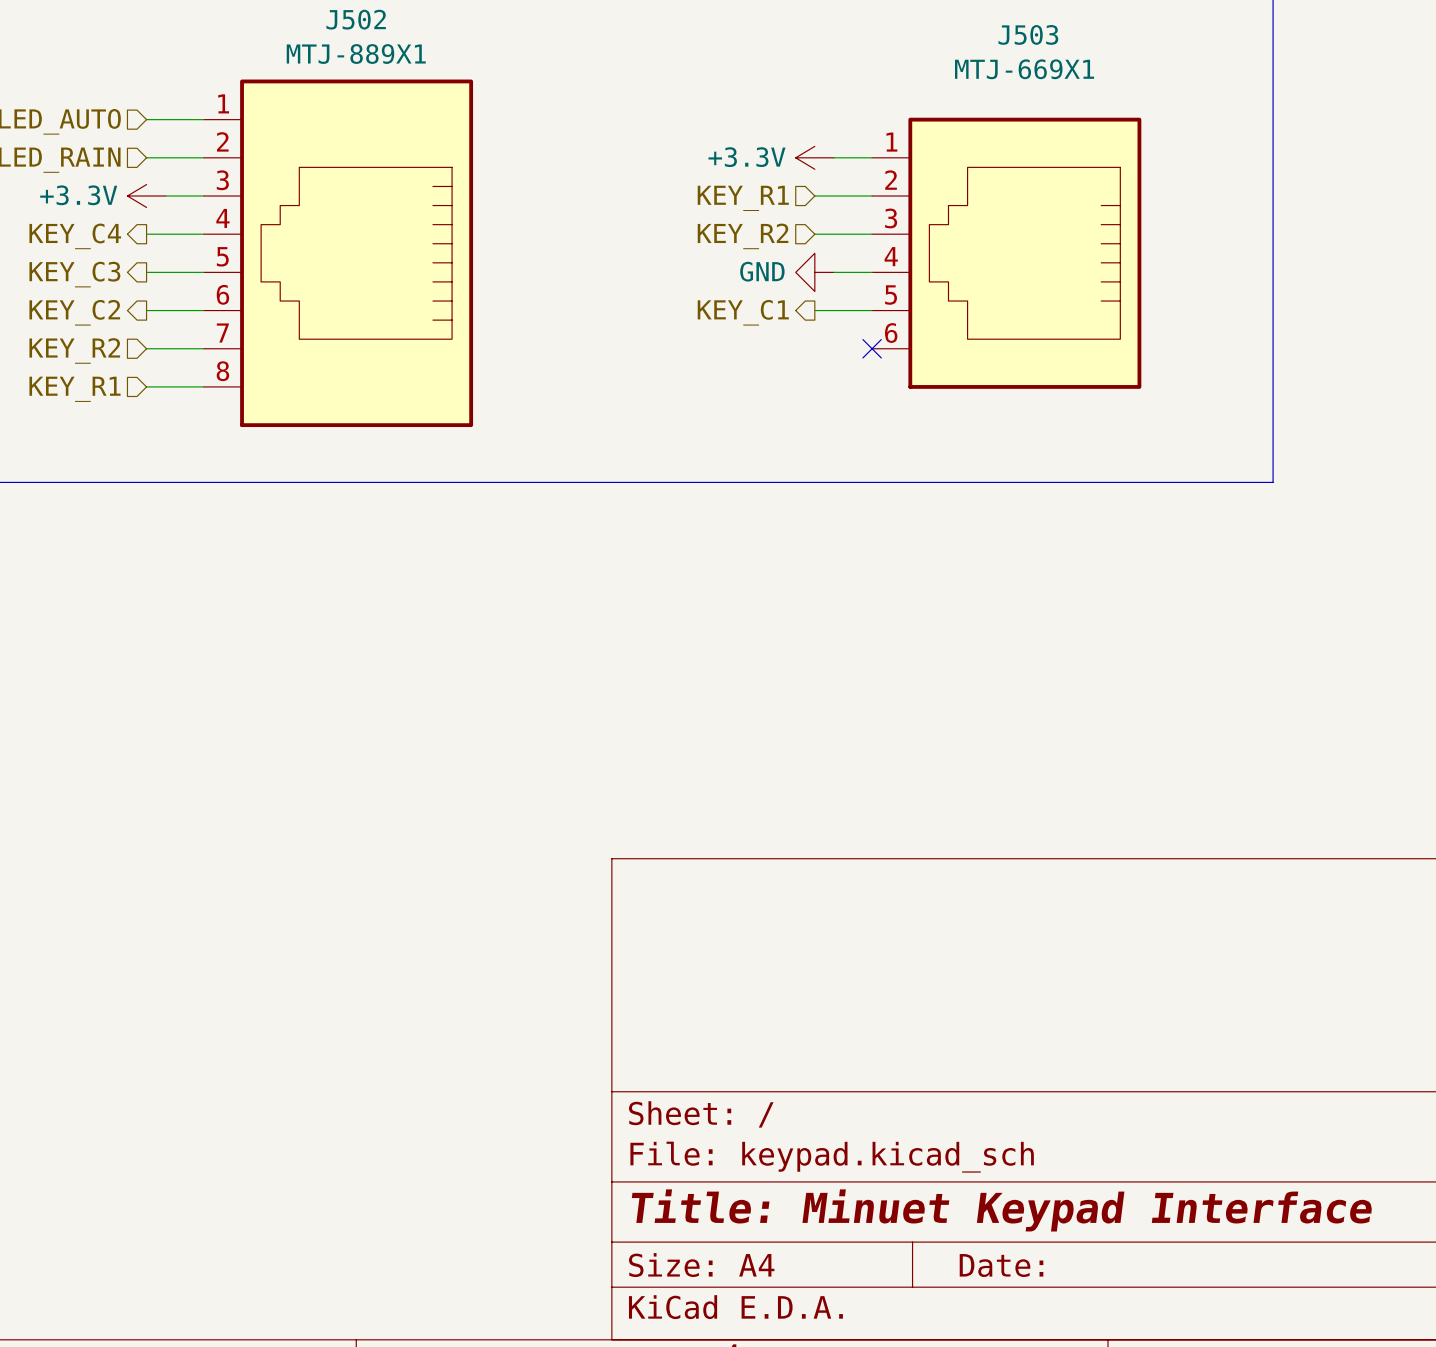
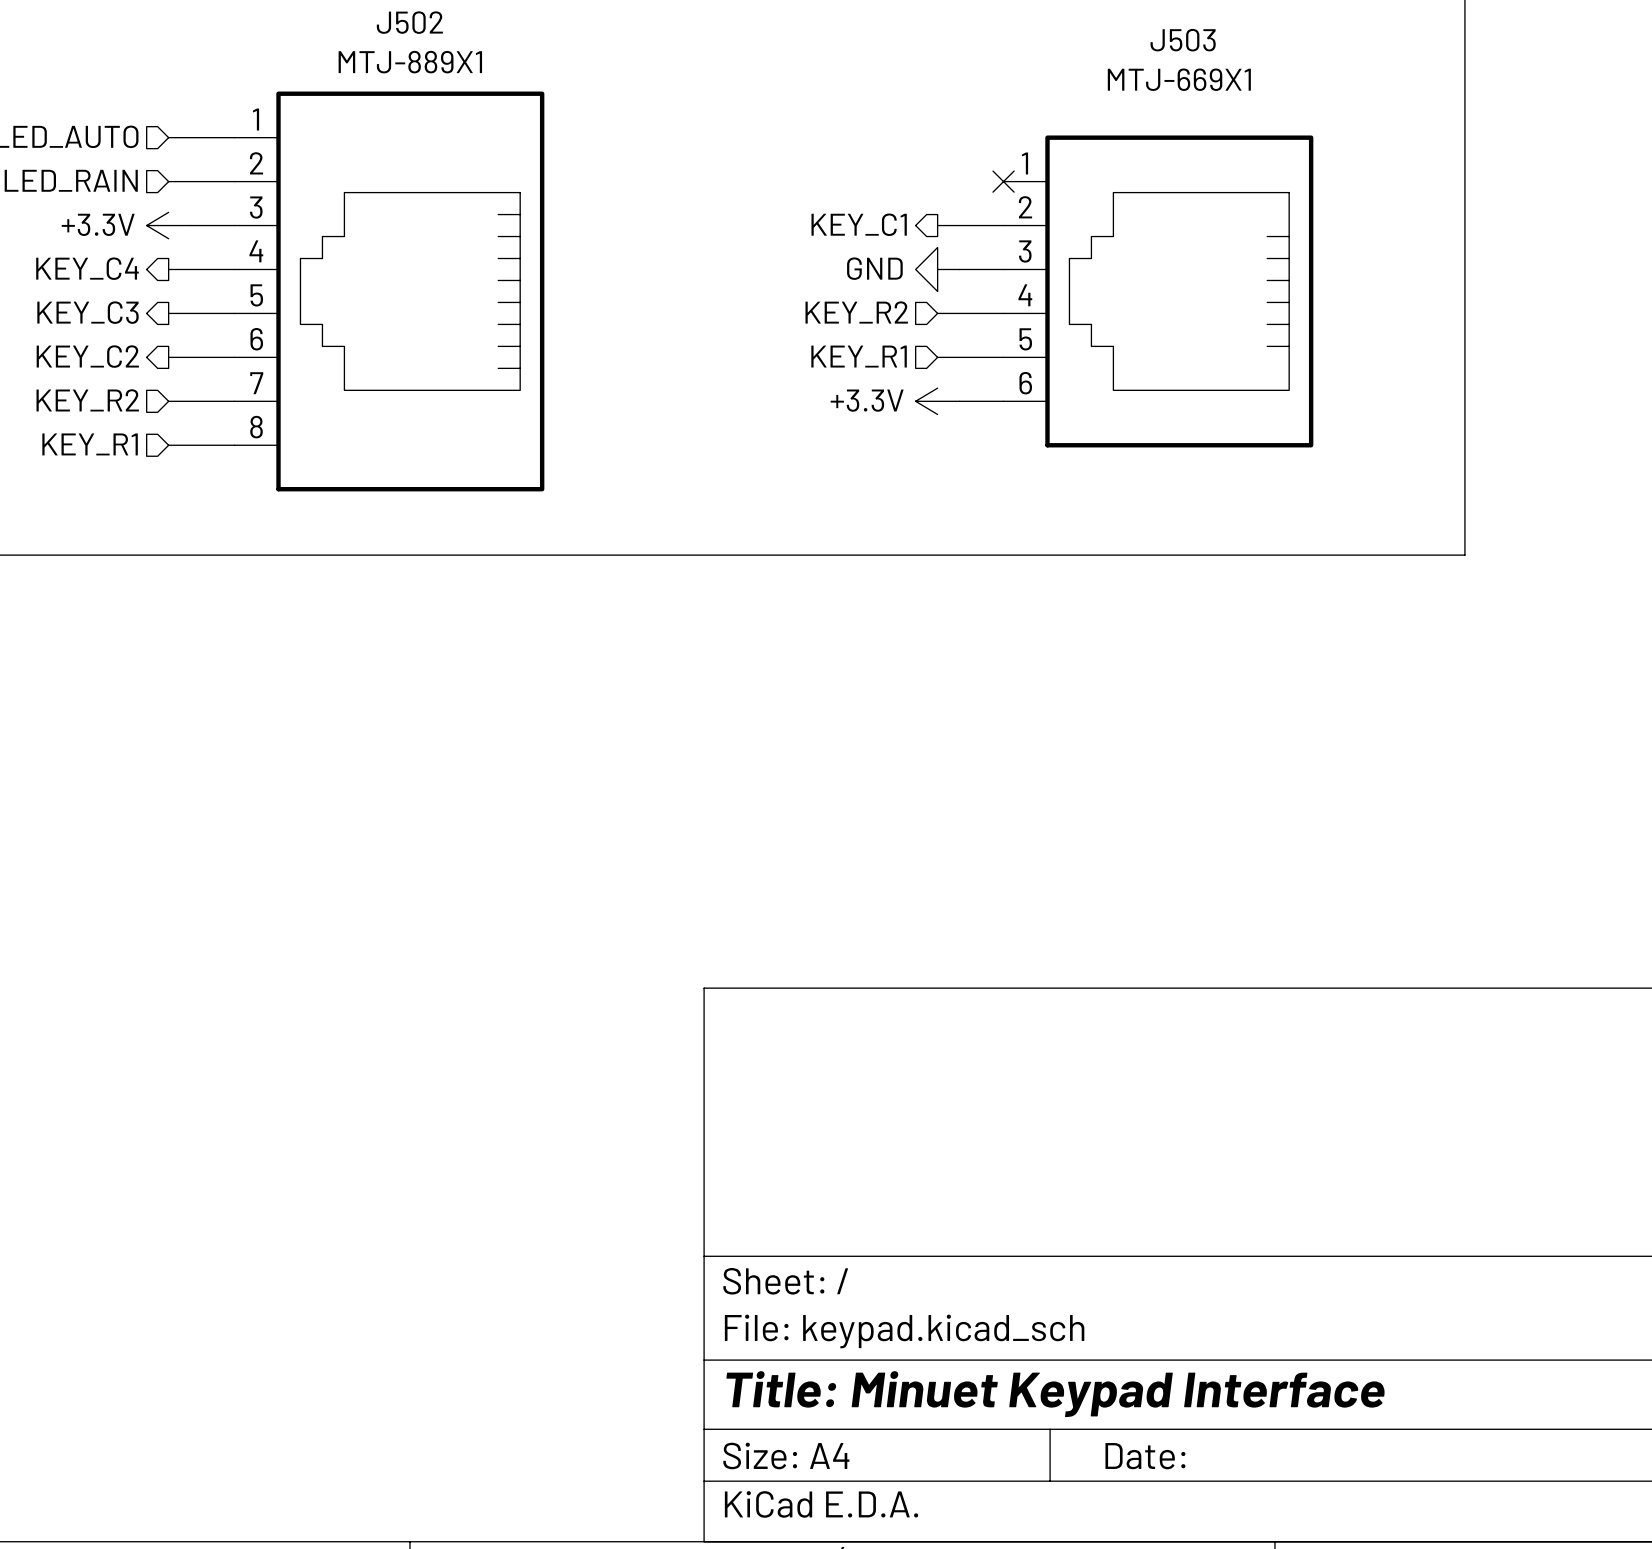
power symbol position: +3.3V (814, 157) -> +3.3V (937, 401)
wire: (833, 157) (872, 157) -> (959, 401) (1003, 401)
no-connect mark: none -> (1003, 181)
hierarchical label shape: input (743, 198) -> output (859, 224)
hierarchical label: KEY_R1 (743, 198) -> KEY_C1 (859, 224)
hierarchical label position: KEY_R2 (743, 236) -> KEY_R2 (856, 312)
power symbol position: GND (814, 272) -> GND (937, 269)
hierarchical label shape: output (743, 312) -> input (859, 356)
hierarchical label: KEY_C1 (743, 312) -> KEY_R1 (859, 356)
no-connect mark: (872, 348) -> none

